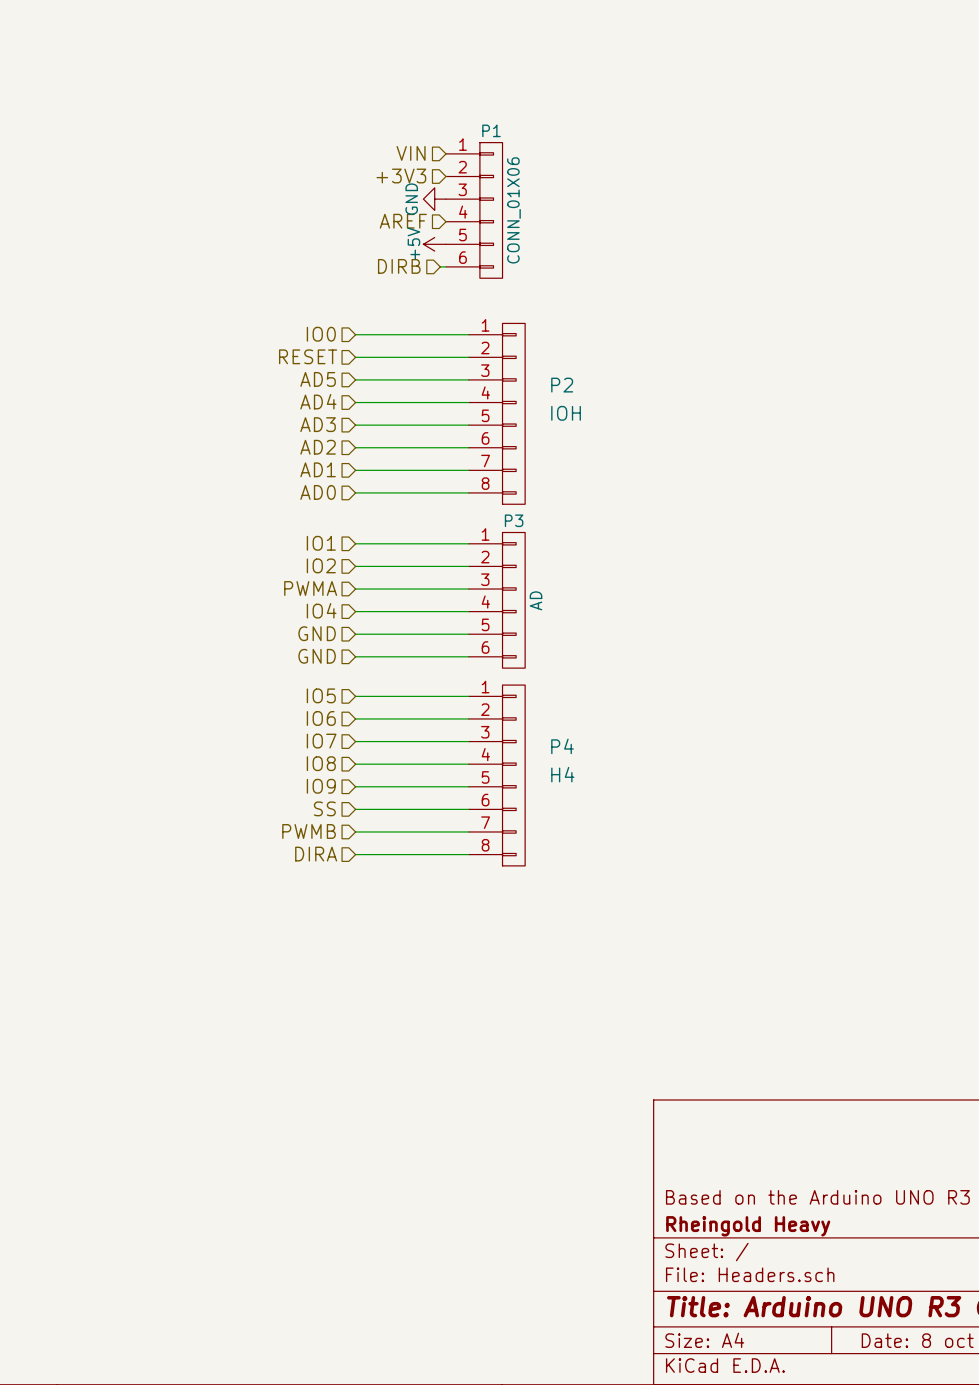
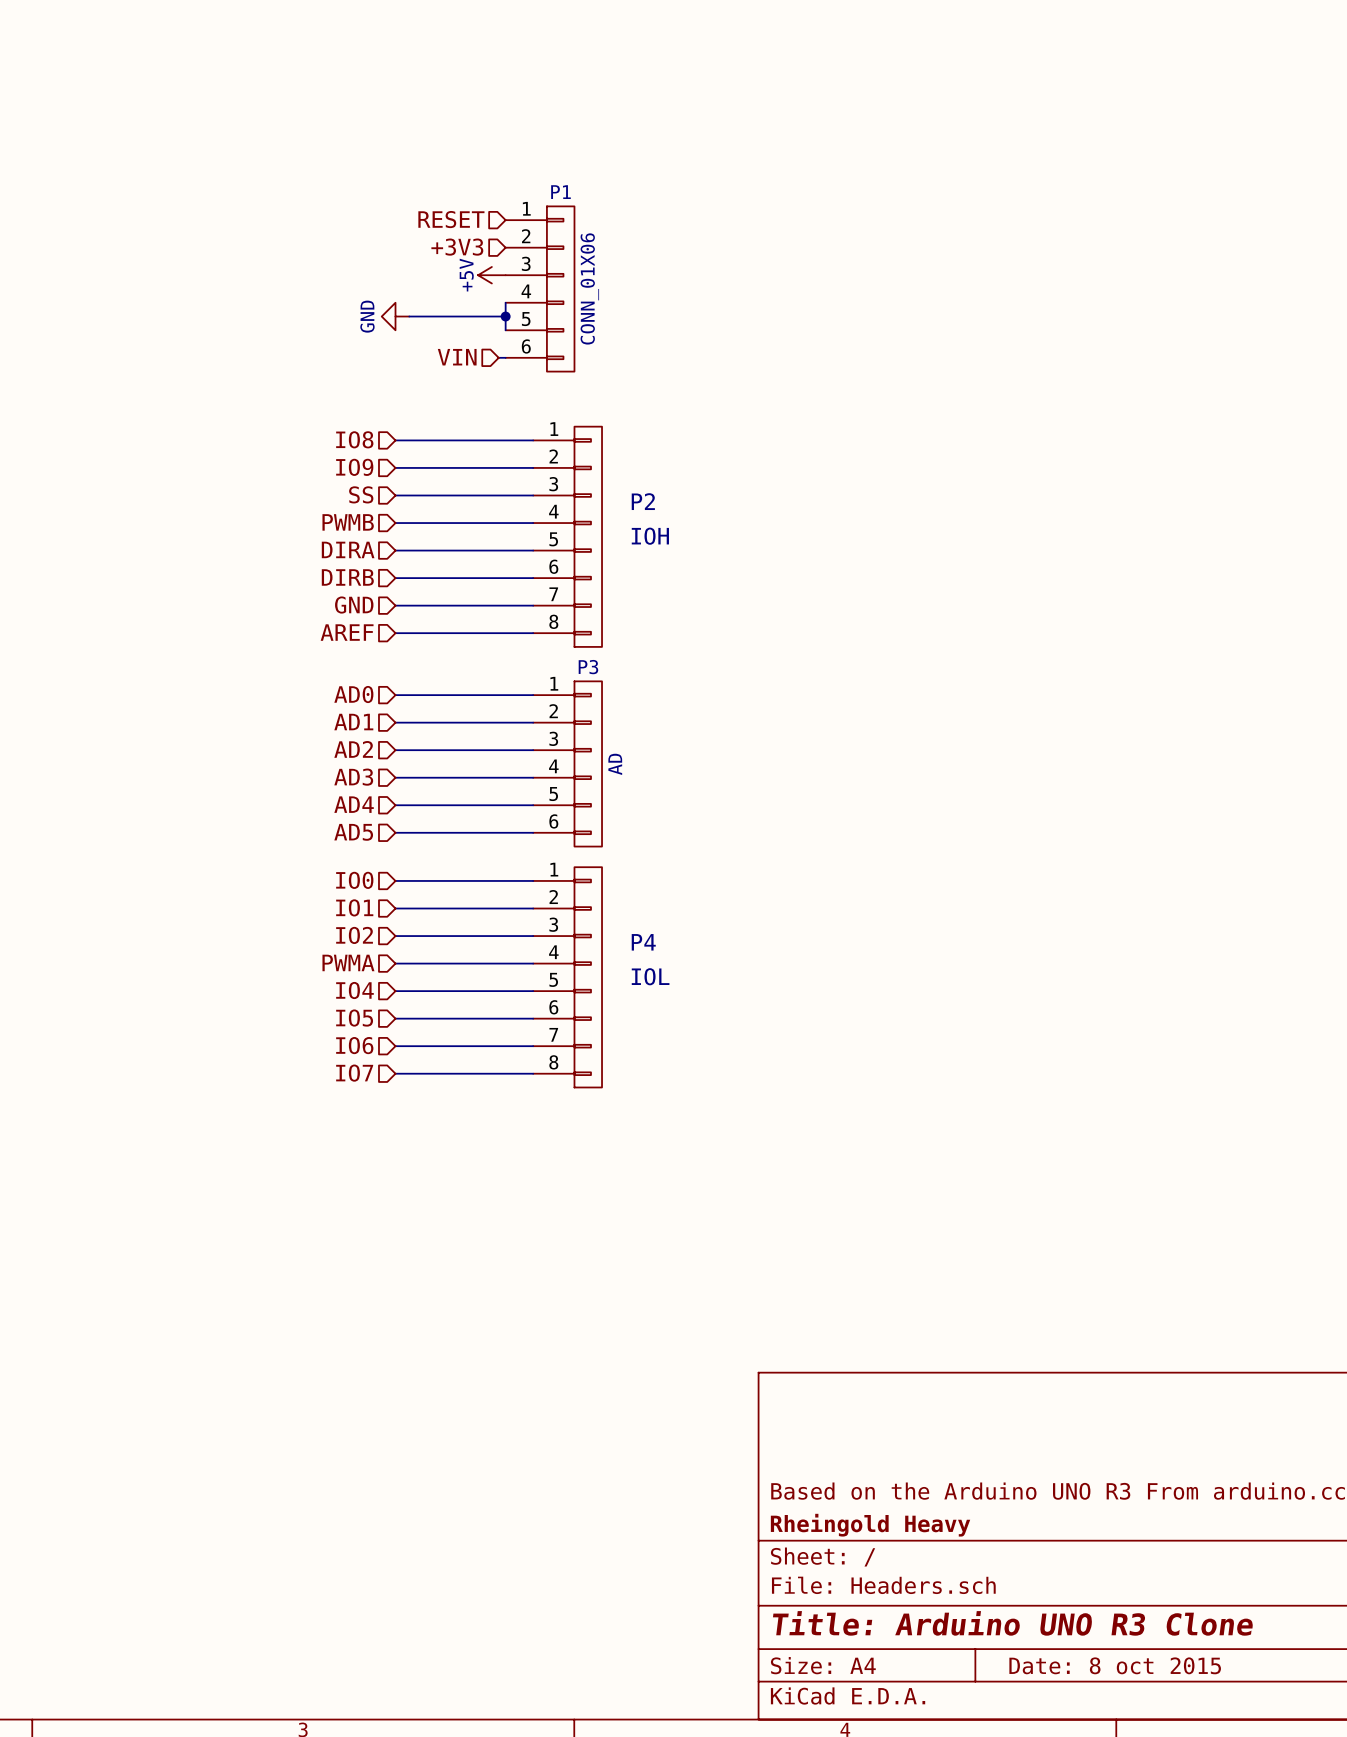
hierarchical label: VIN (411, 153) -> RESET (451, 219)
power symbol: GND (434, 199) -> +5V (491, 275)
hierarchical label: AREF (403, 221) -> none
wire: none -> (505, 302) (505, 330)
power symbol: none -> GND (395, 316)
wire: none -> (409, 316) (505, 316)
junction: none -> (505, 316)
power symbol: +5V (434, 244) -> none
hierarchical label: DIRB (399, 266) -> VIN (457, 357)
hierarchical label: IO0 (321, 334) -> IO8 (354, 439)
hierarchical label: RESET (308, 356) -> IO9 (354, 467)
hierarchical label: AD5 (318, 379) -> SS (361, 494)
hierarchical label: AD4 (318, 401) -> PWMB (348, 522)
hierarchical label: AD3 (318, 424) -> DIRA (348, 549)
hierarchical label: AD2 (318, 447) -> DIRB (347, 577)
hierarchical label: AD1 (318, 469) -> GND (354, 605)
hierarchical label: AD0 (318, 492) -> AREF (347, 632)
hierarchical label: IO1 (321, 543) -> AD0 (353, 694)
hierarchical label: IO2 (321, 565) -> AD1 (353, 722)
hierarchical label: PWMA (310, 588) -> AD2 (353, 749)
hierarchical label: IO4 (321, 610) -> AD3 (353, 777)
hierarchical label: GND (317, 633) -> AD4 (354, 804)
hierarchical label: GND (317, 656) -> AD5 (353, 832)
hierarchical label: IO5 (321, 695) -> IO0 (354, 880)
hierarchical label: IO6 (321, 718) -> IO1 (354, 907)
hierarchical label: IO7 (321, 741) -> IO2 (354, 935)
hierarchical label: IO8 (321, 763) -> PWMA (348, 962)
P4 value: H4 (562, 774) -> IOL (650, 976)
hierarchical label: IO9 (321, 786) -> IO4 (354, 990)
hierarchical label: SS (324, 808) -> IO5 (354, 1018)
hierarchical label: PWMB (309, 831) -> IO6 (354, 1045)
hierarchical label: DIRA (316, 854) -> IO7 (354, 1073)

